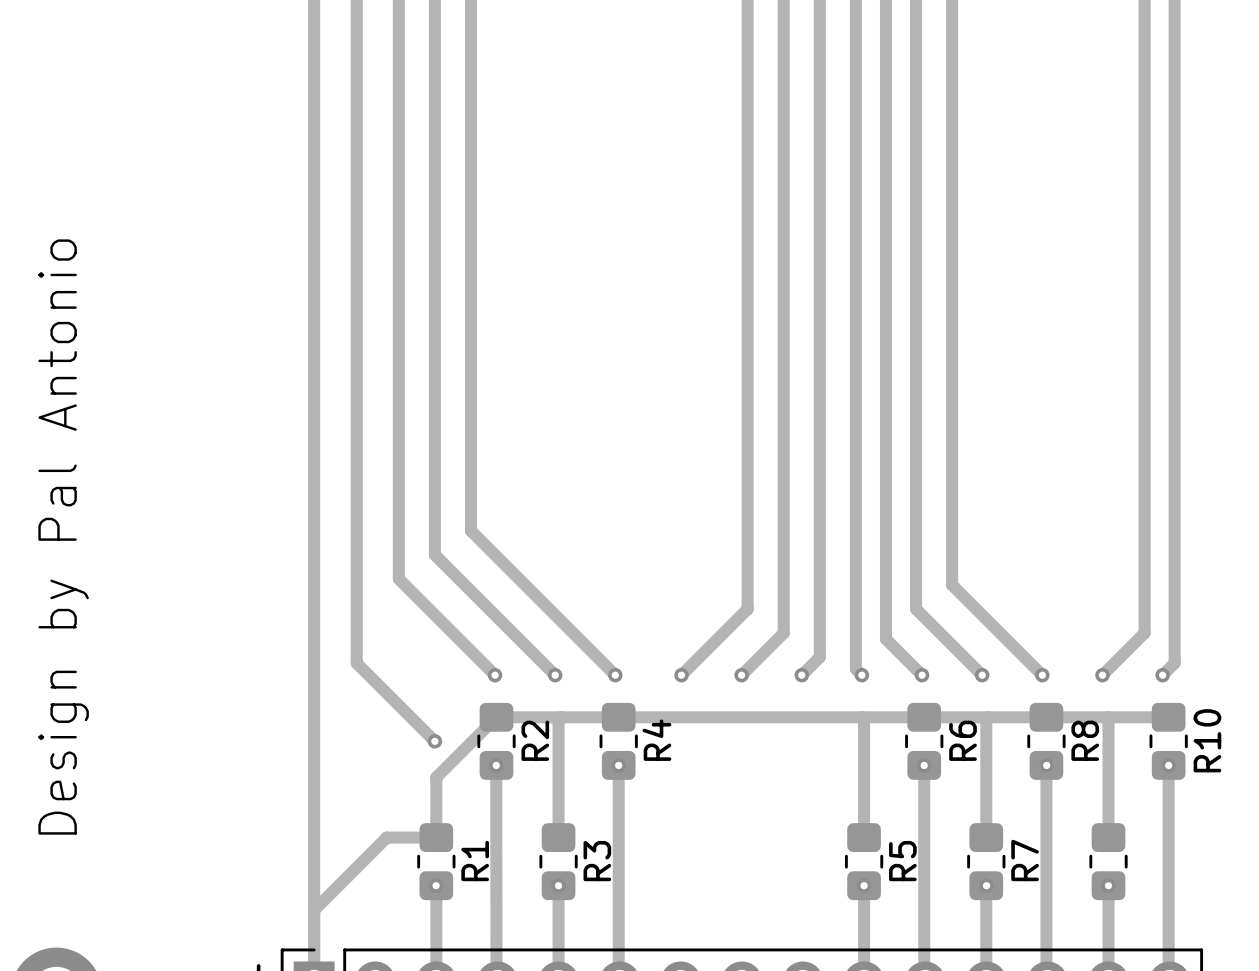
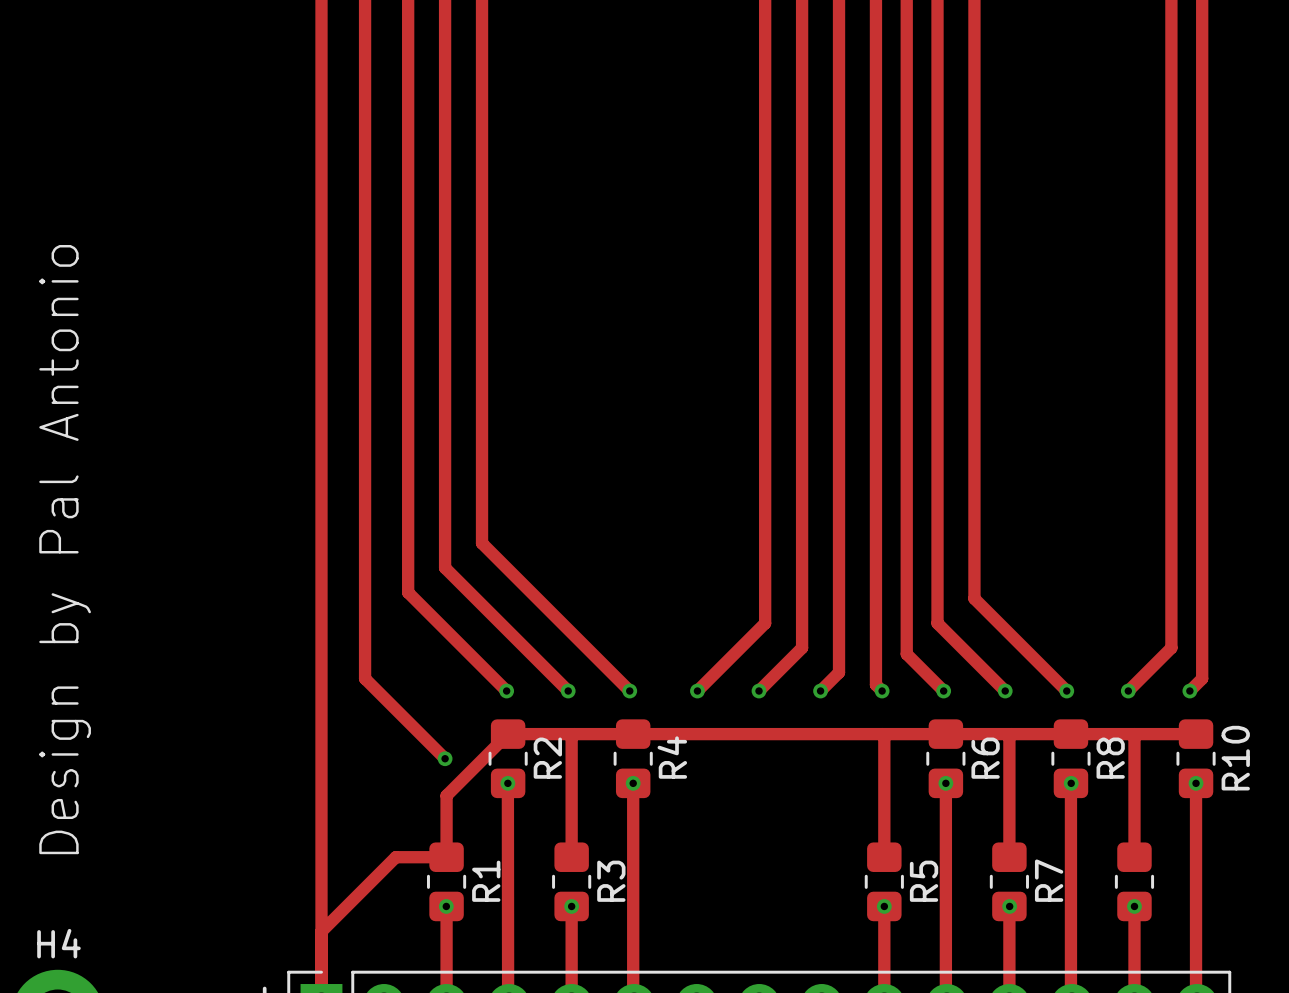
H4 name: none -> H4 (58, 943)

